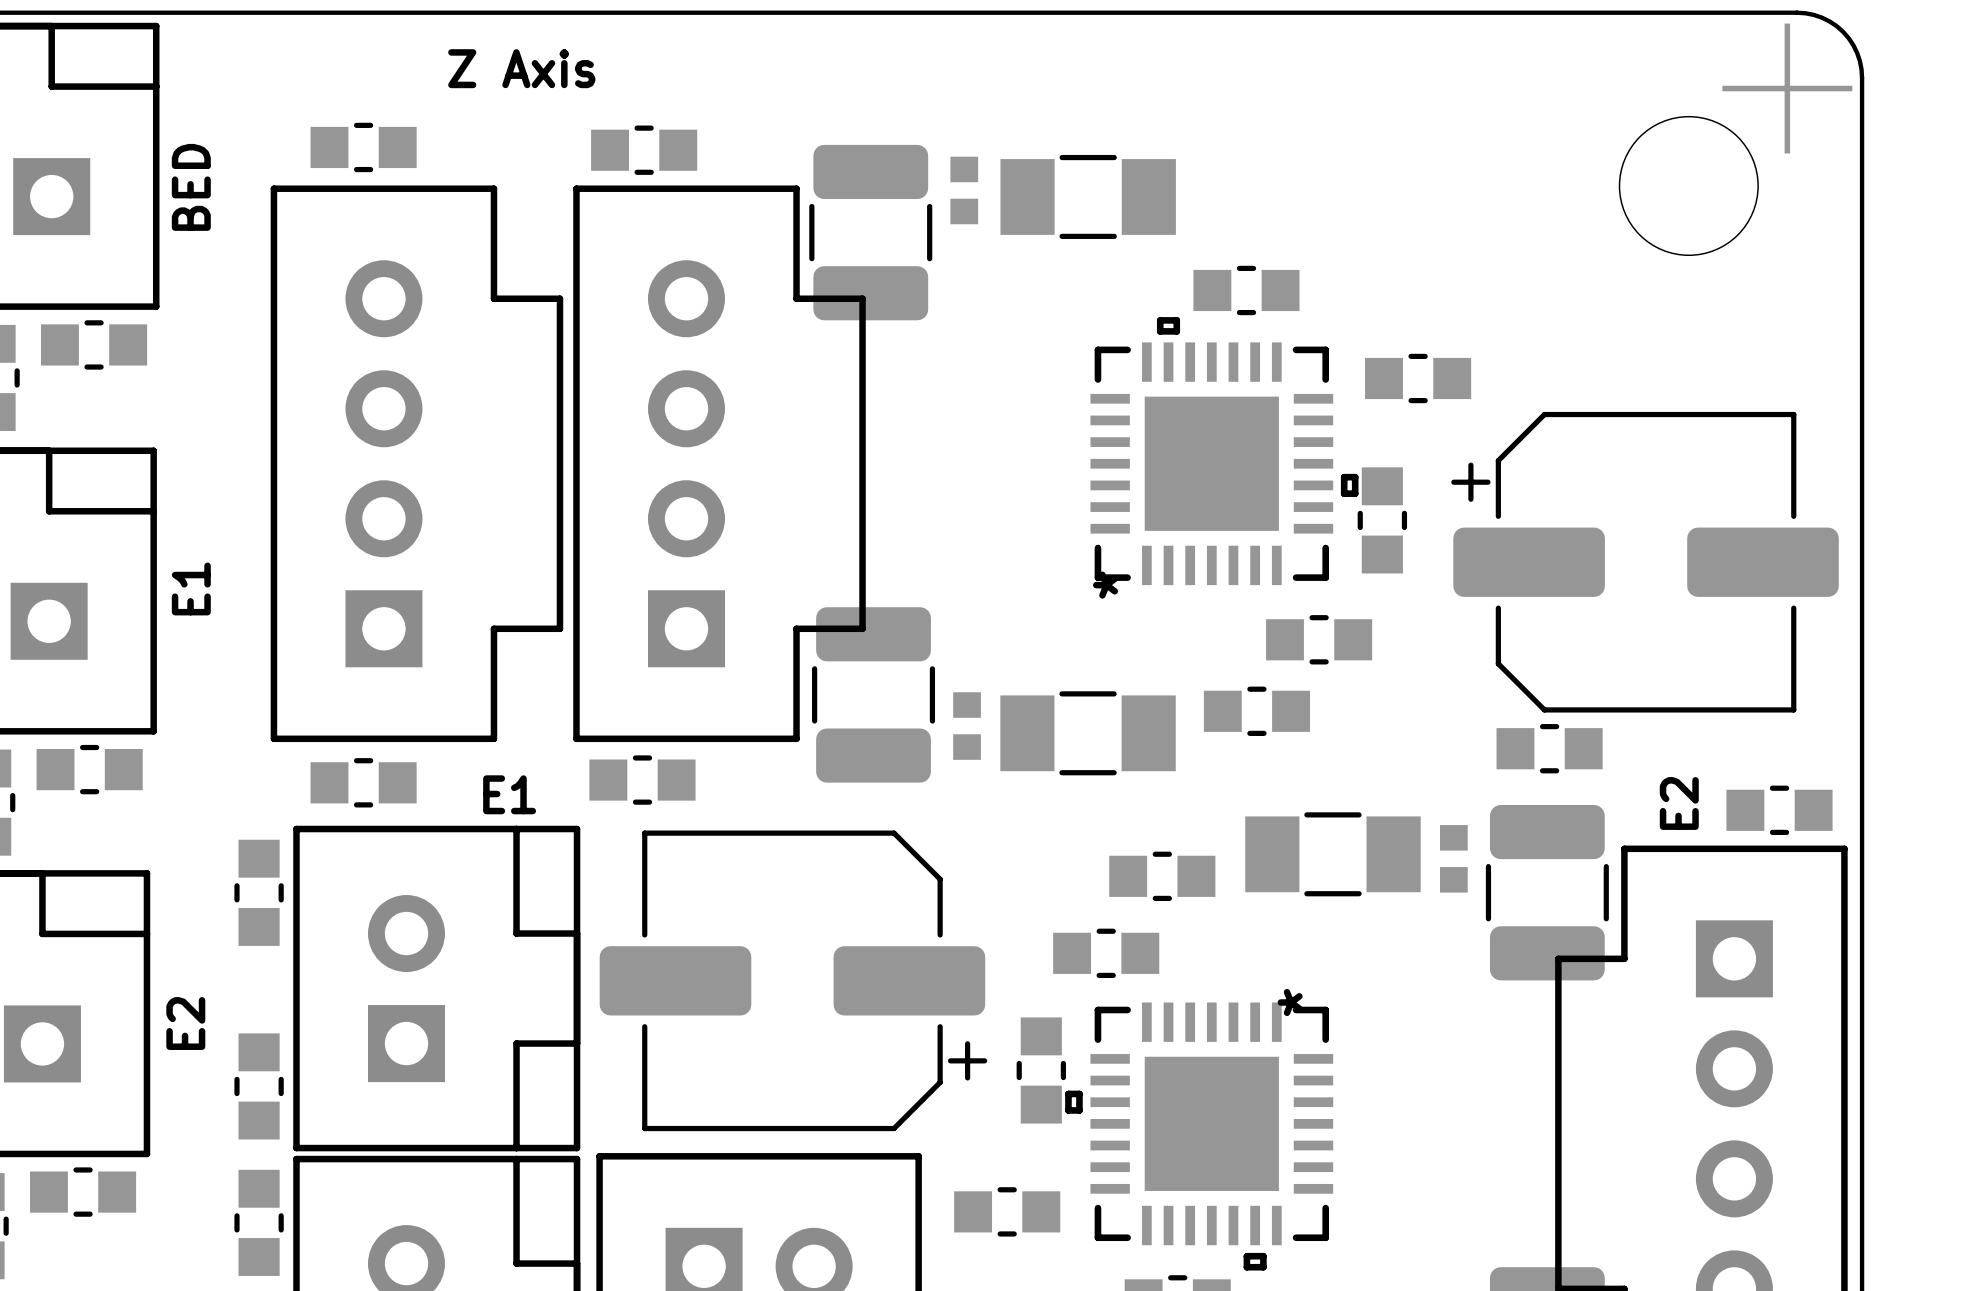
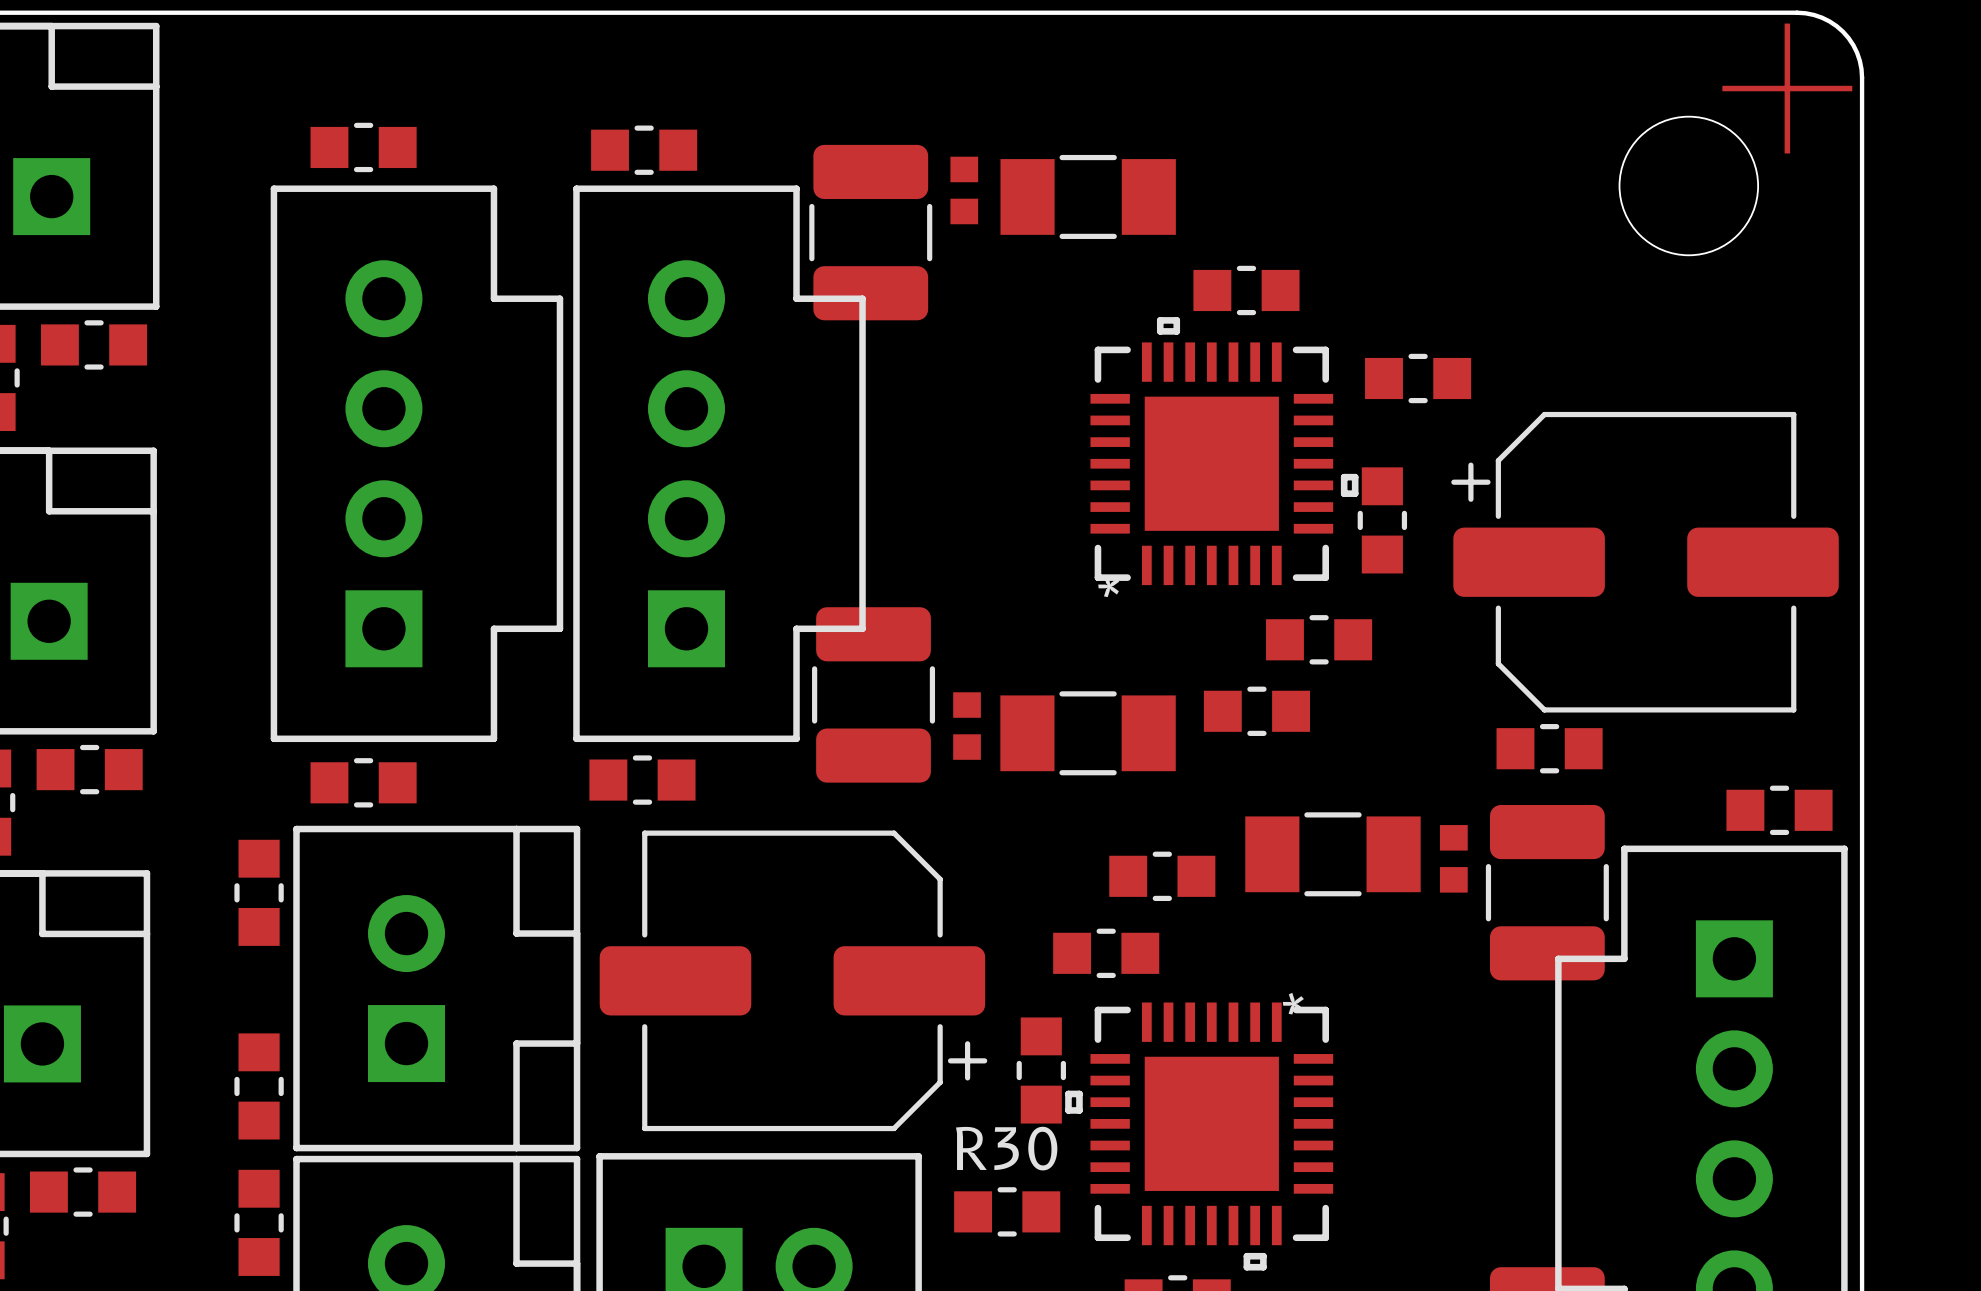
text: Z Axis (521, 68) -> none
text: BED (191, 187) -> none
text: E1 (191, 588) -> none
text: E1 (509, 794) -> none
text: E2 (1679, 803) -> none
text: E2 (185, 1023) -> none
R30 name: none -> R30 (1006, 1148)

